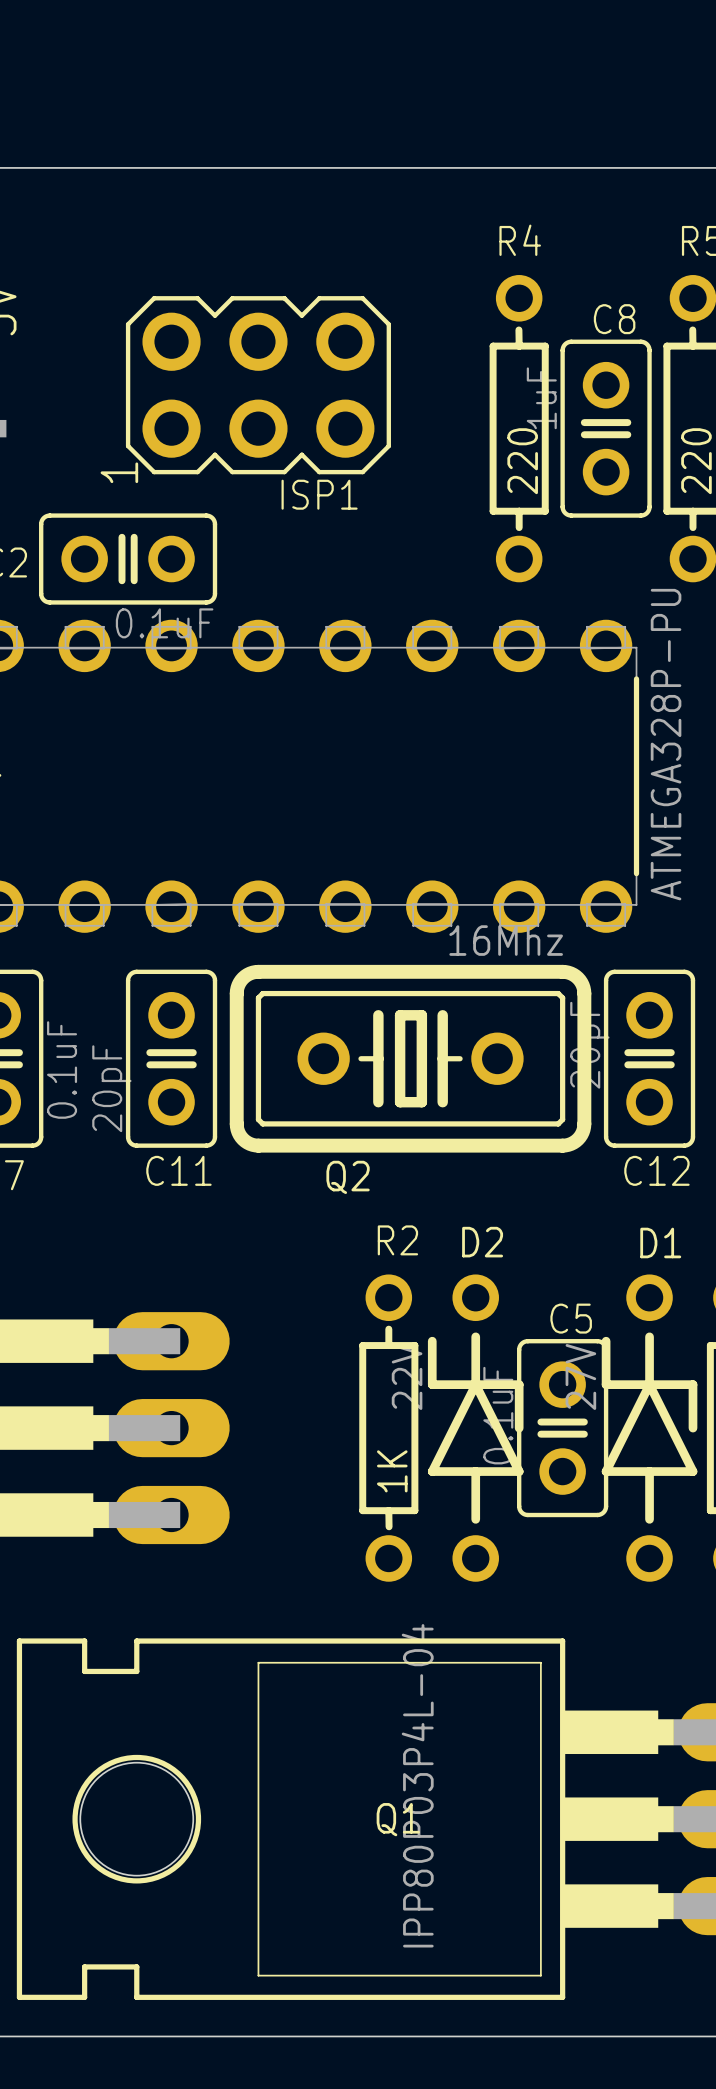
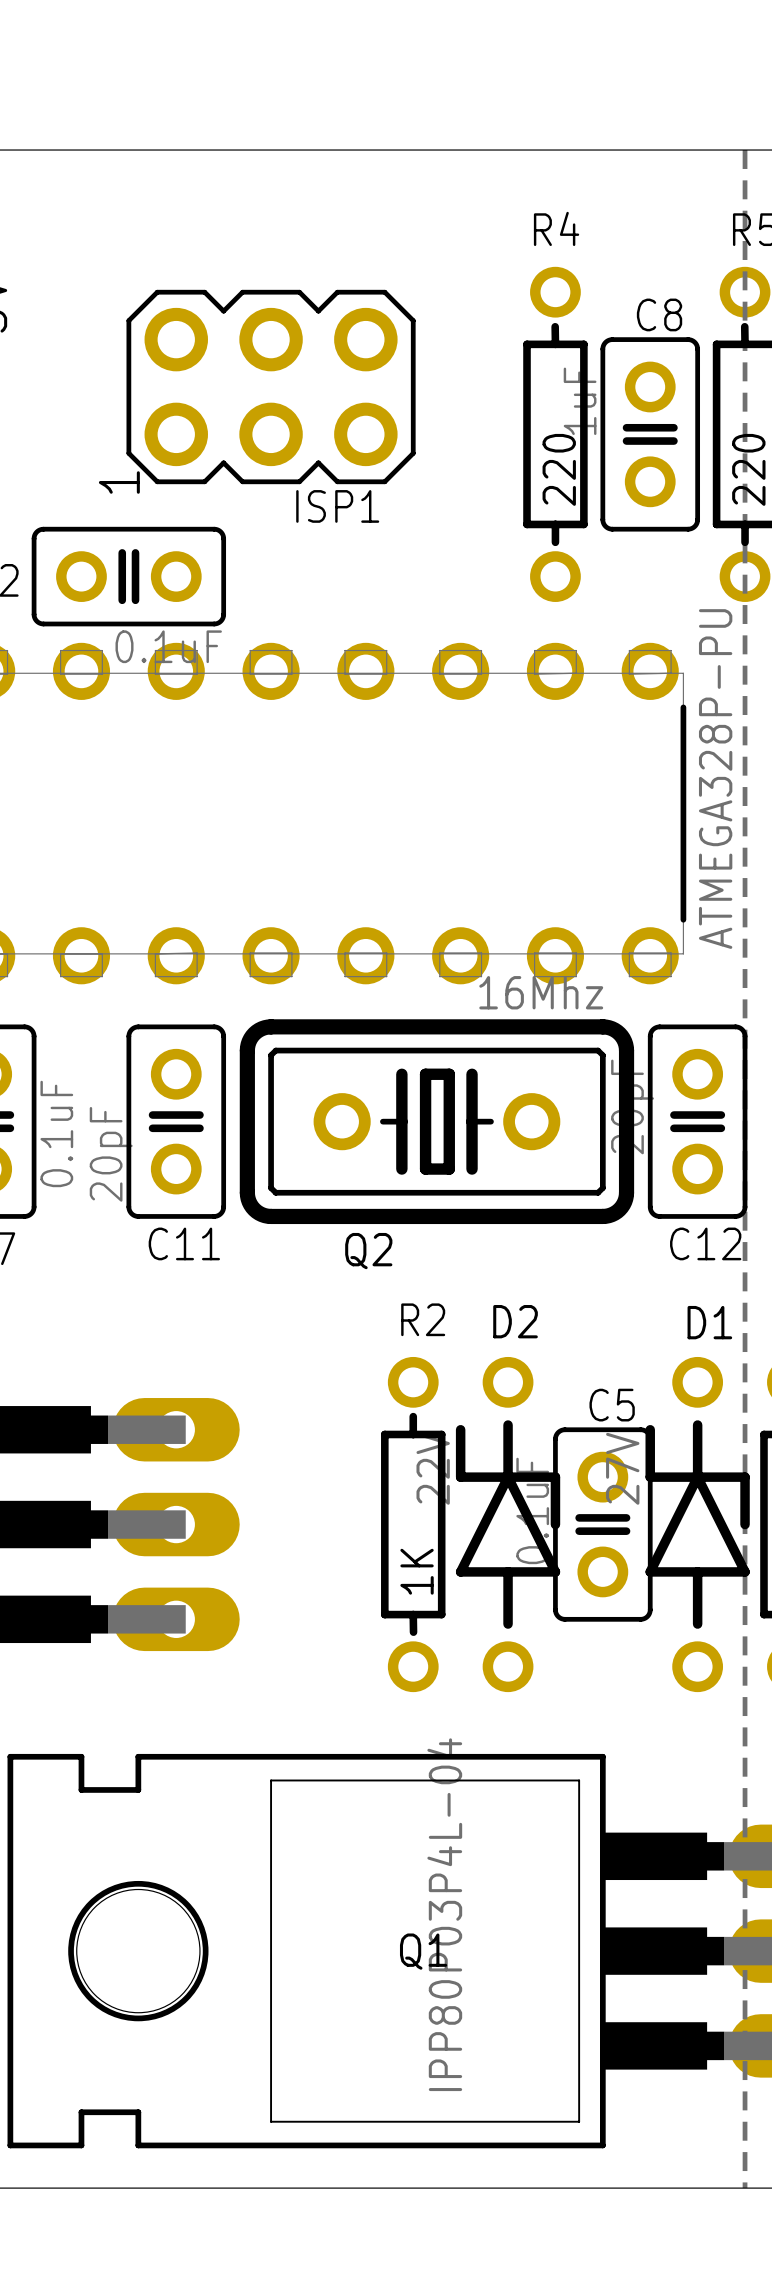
line: none -> (745, 150) (745, 2188)

